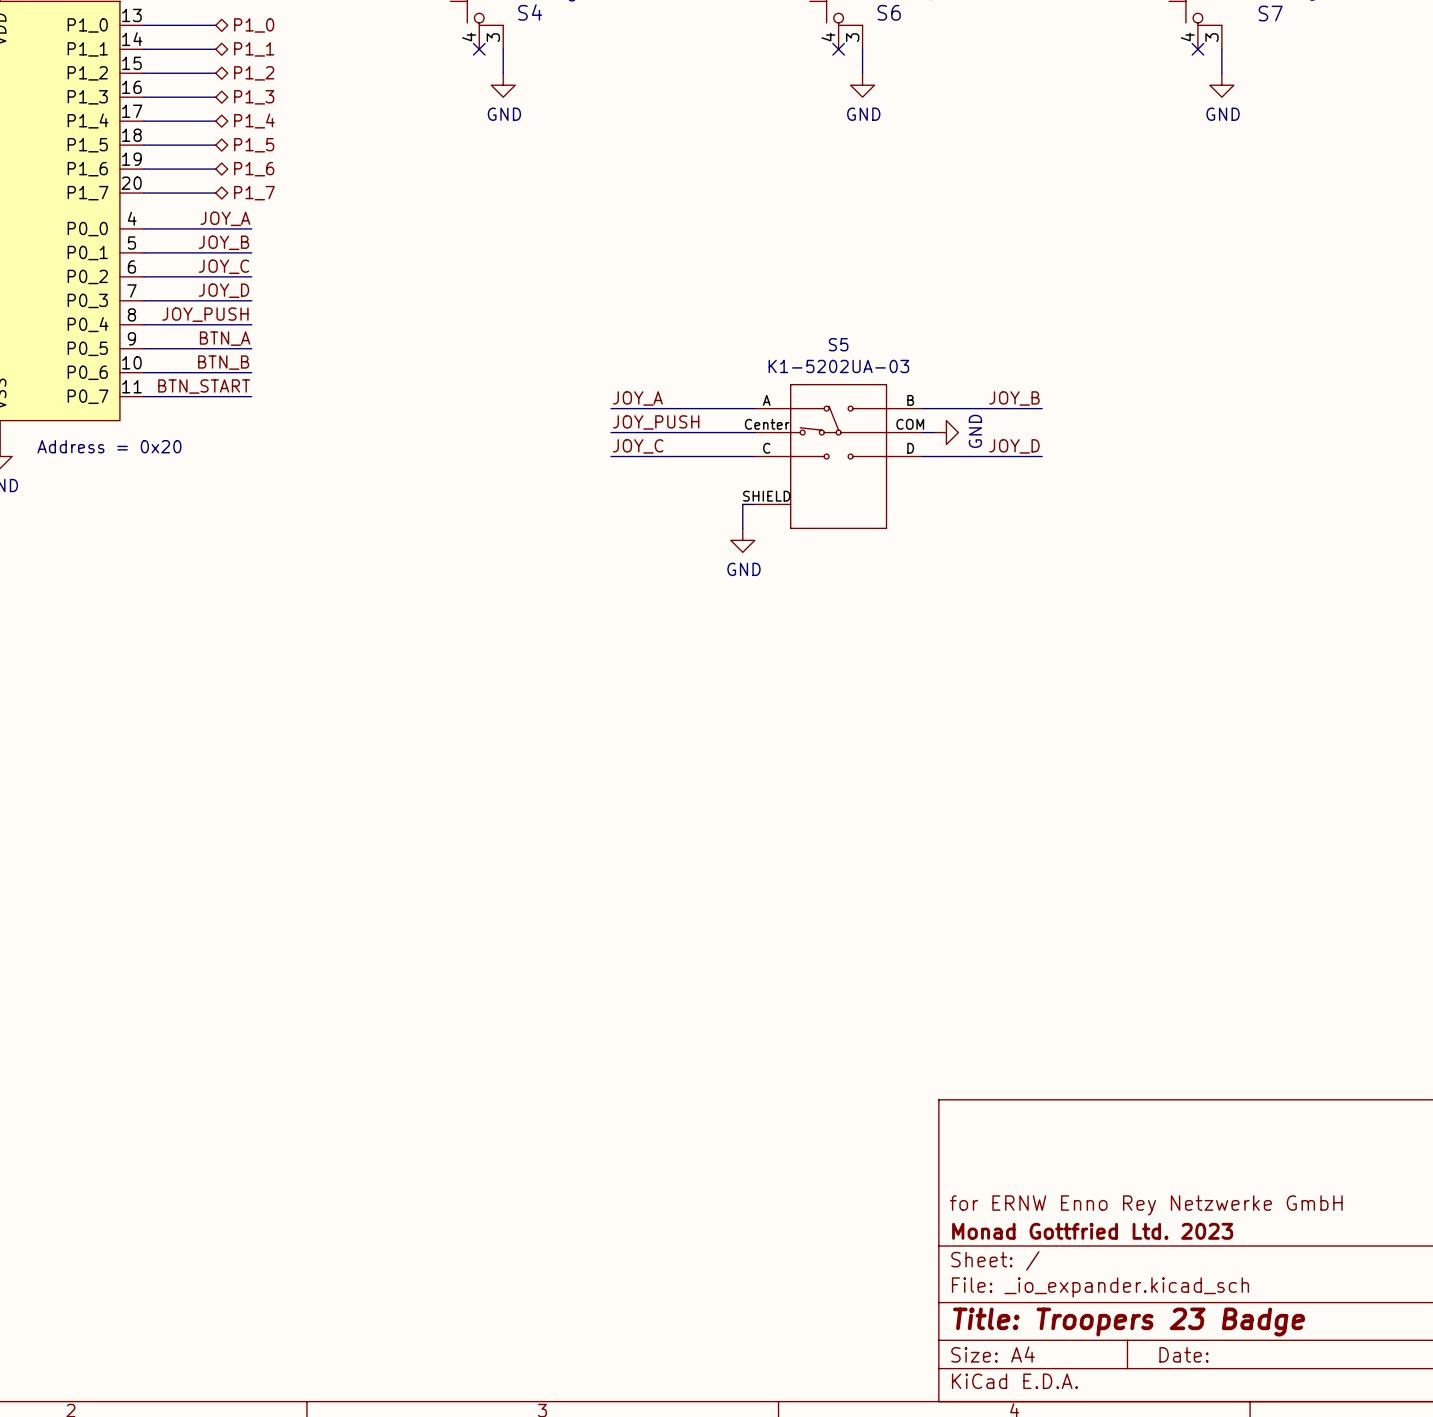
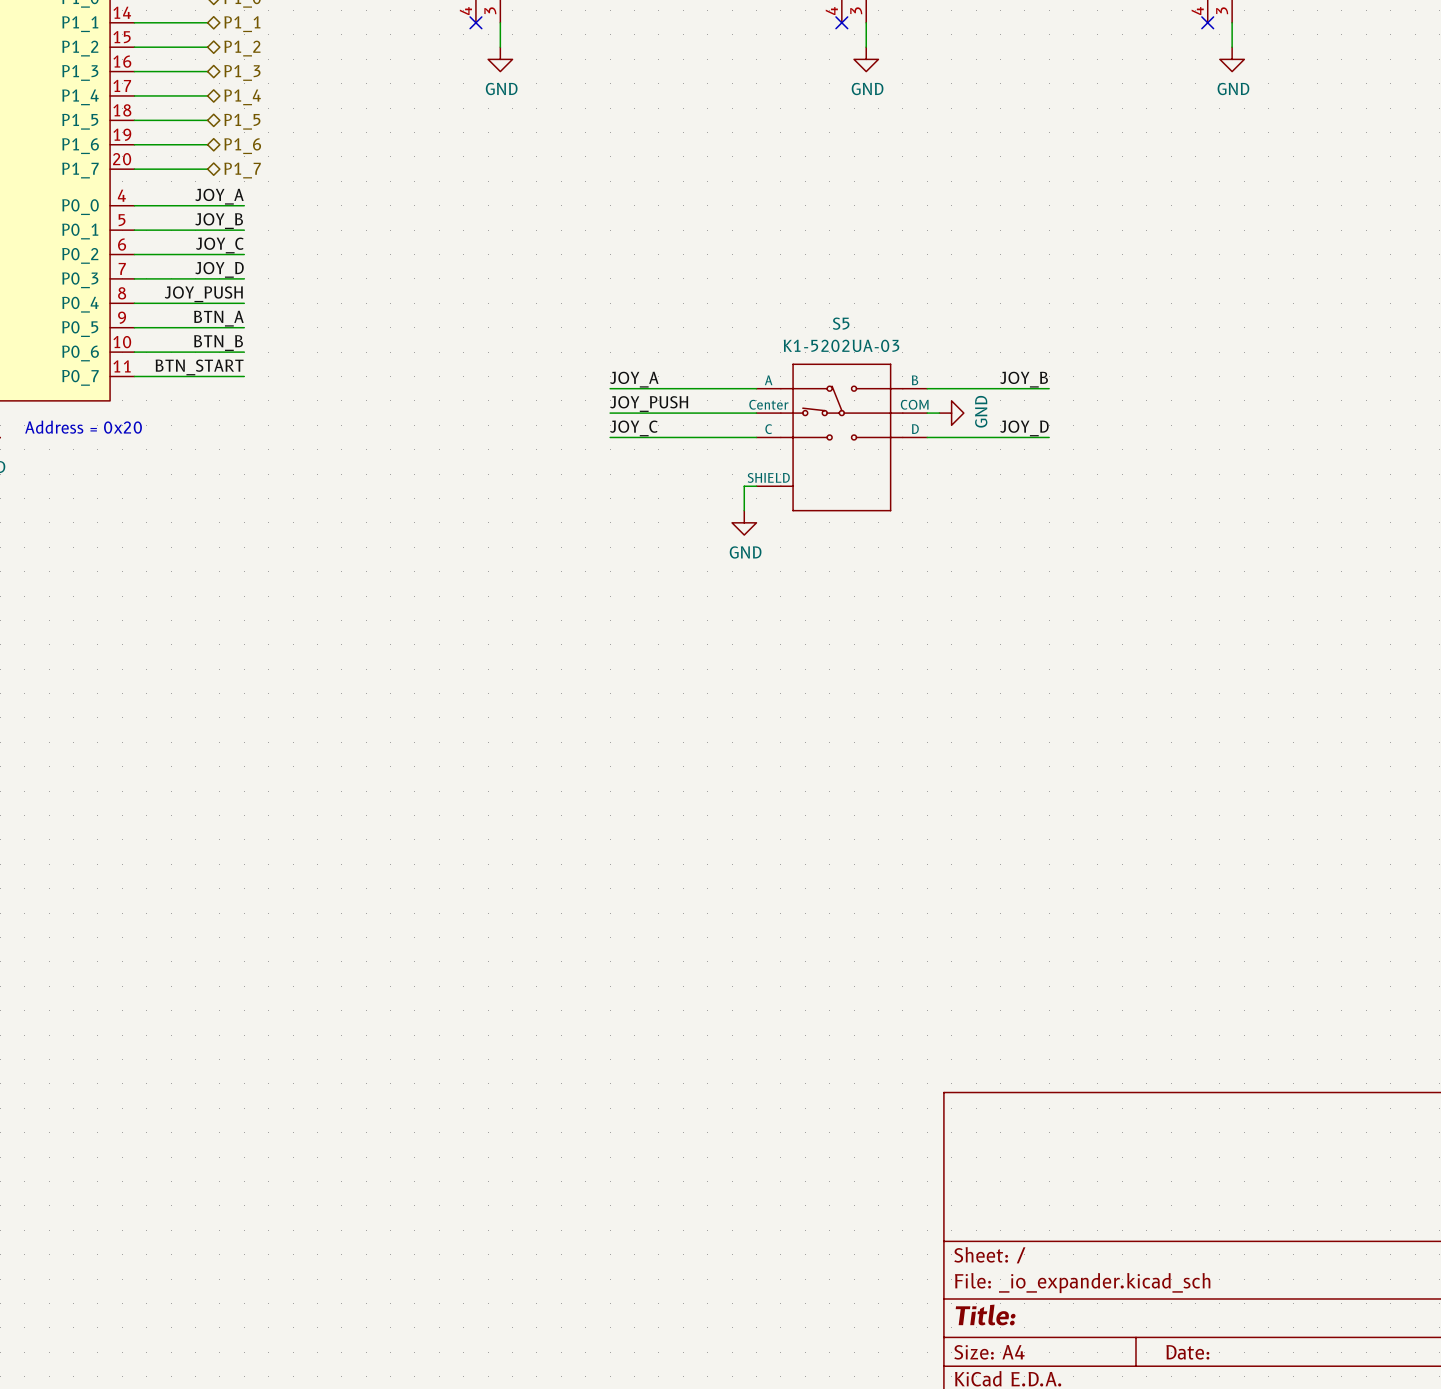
title block: for ERNW Enno Rey Netzwerke GmbH (1146, 1205) -> none
title block: Monad Gottfried Ltd. 2023 (1092, 1231) -> none
title block: Title: Troopers 23 Badge (1129, 1322) -> Title: (985, 1315)

